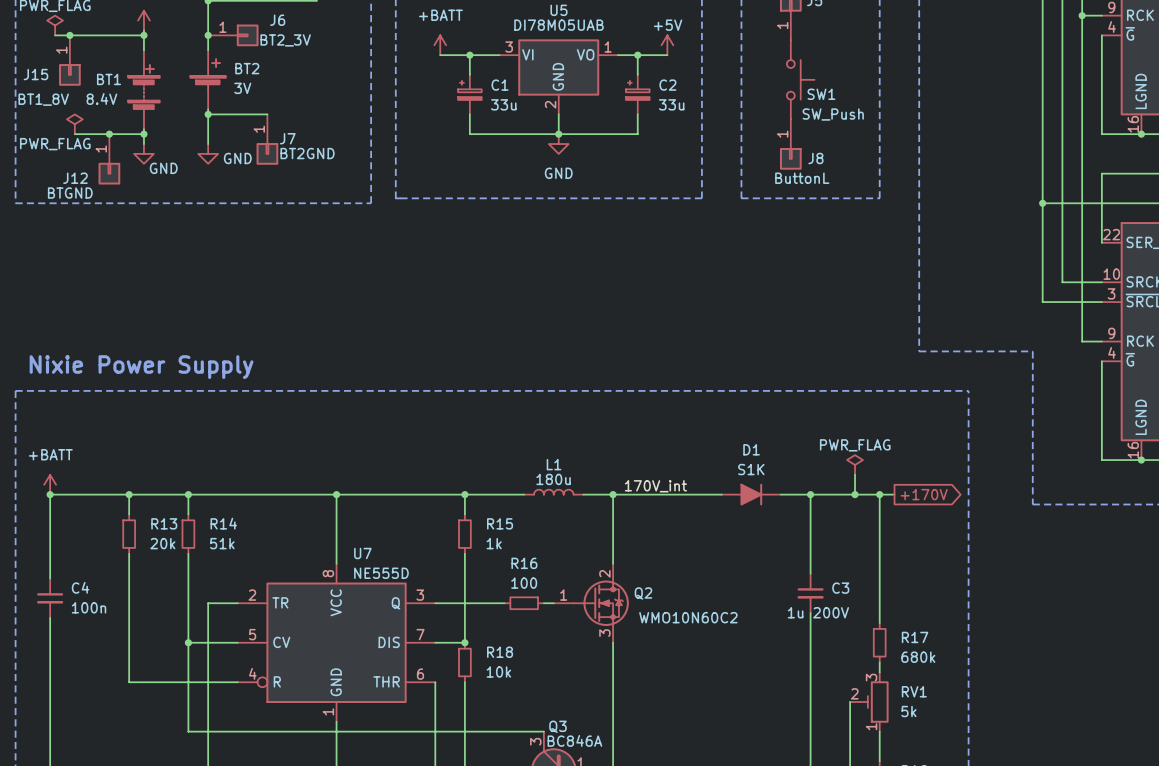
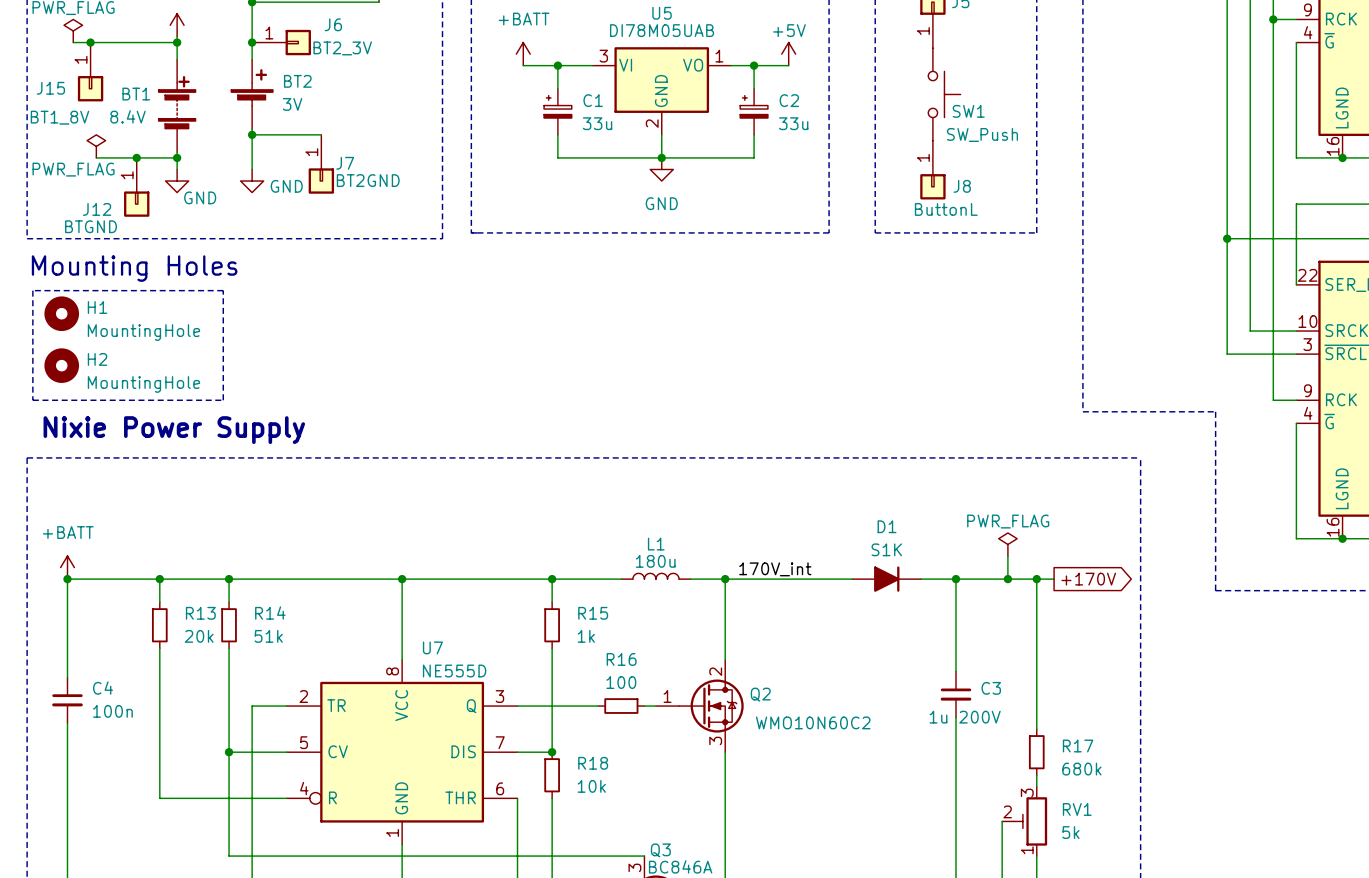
text: none -> Mounting Holes (134, 268)
line: none -> (32, 290) (32, 400) (223, 400) (223, 290) (32, 290)
H1: none -> MountingHole (61, 313)
H2: none -> MountingHole (61, 365)

